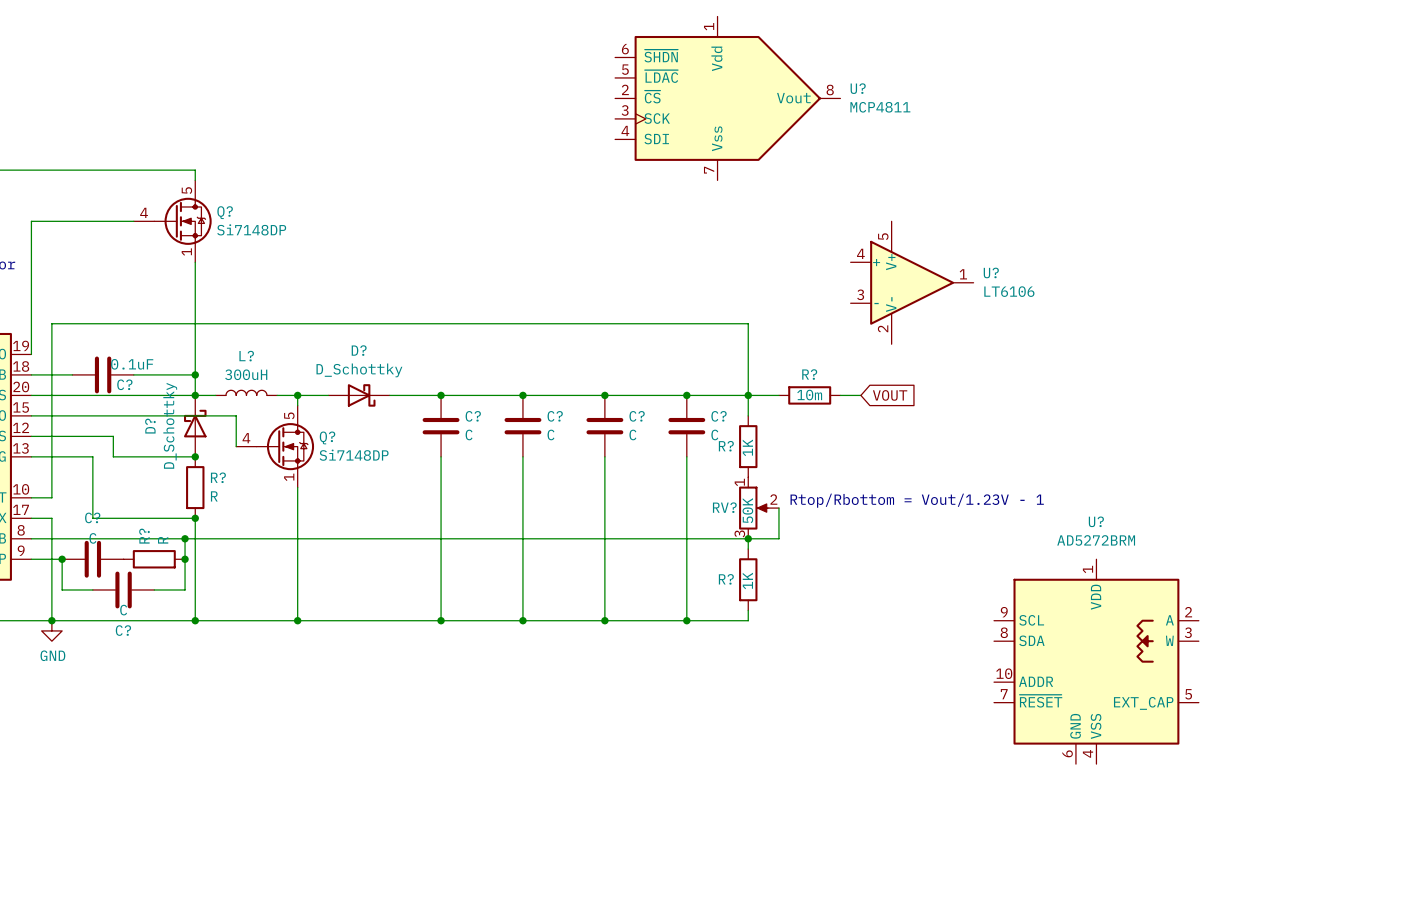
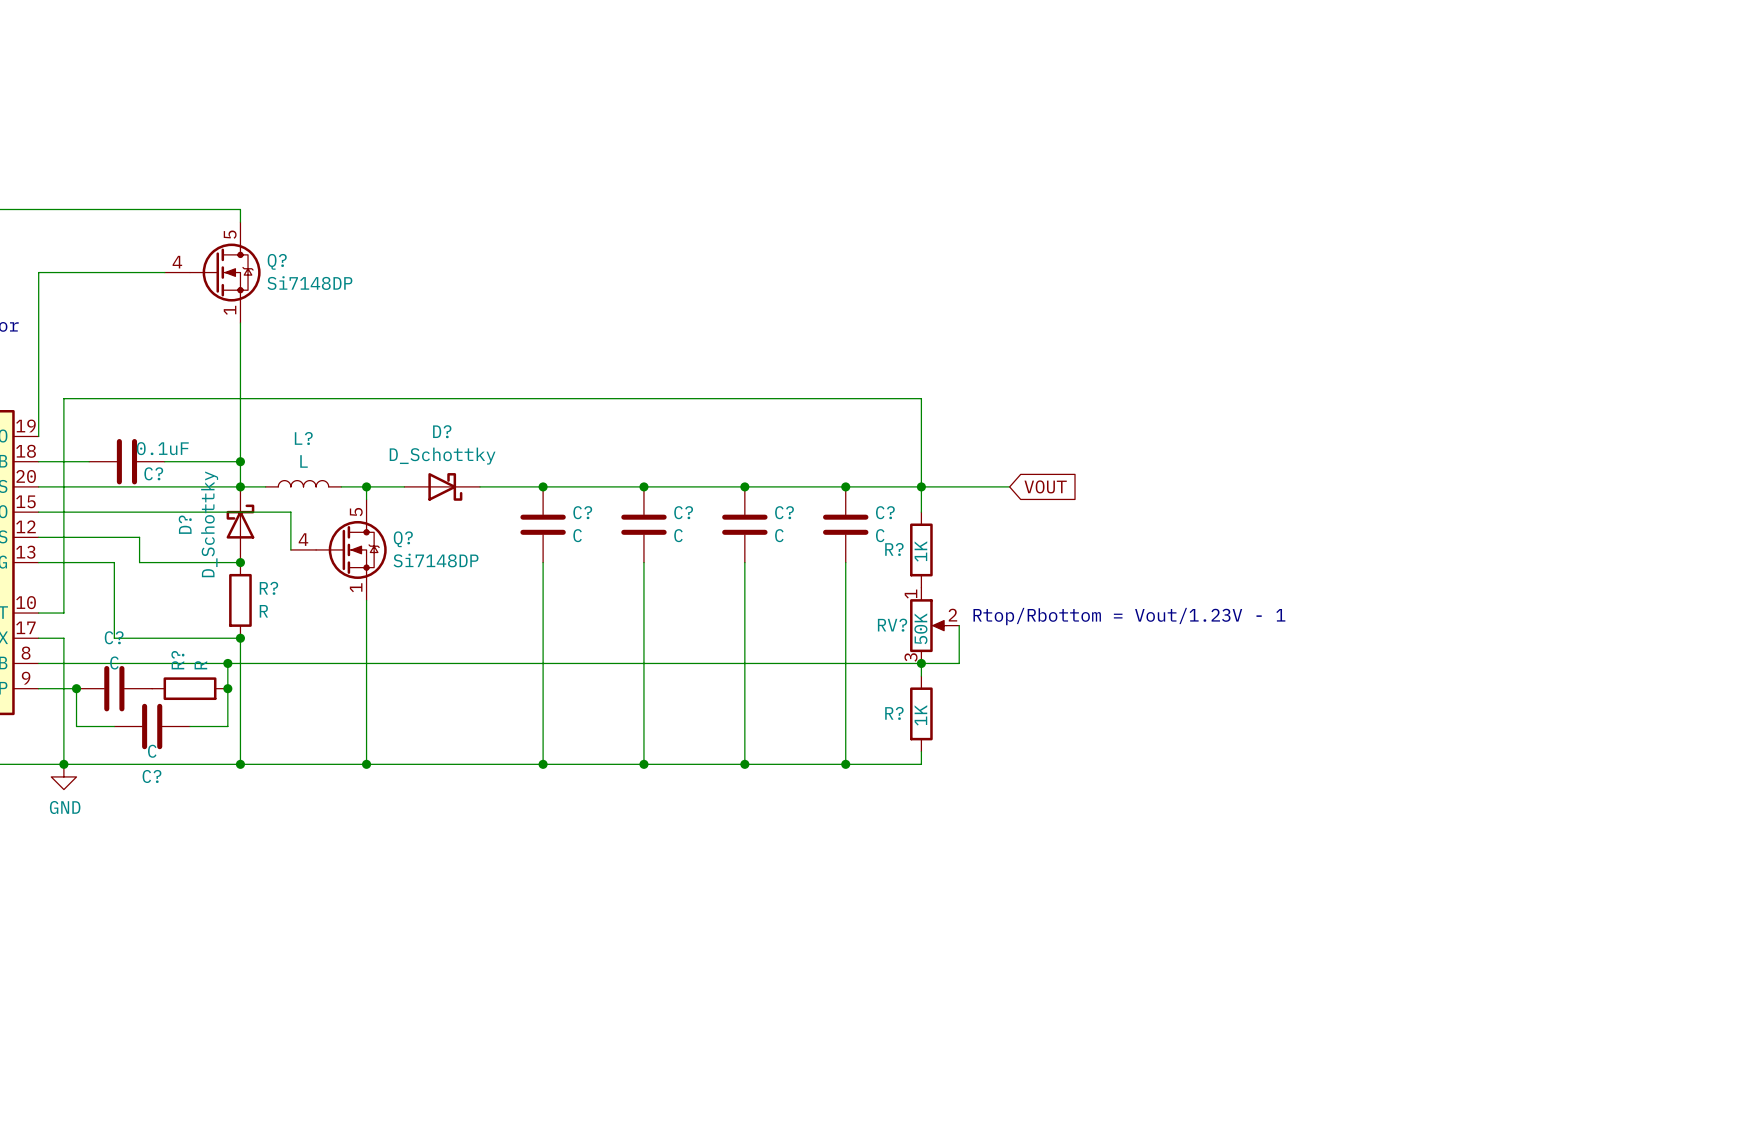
U?: MCP4811 (727, 98) -> none
U?: LT6106 (912, 282) -> none
L? value: 300uH (246, 374) -> L (303, 461)
wire: none -> (959, 486) (1009, 486)
R?: 10m (809, 395) -> none
wire: (840, 395) (860, 395) -> none
global label position: VOUT (890, 395) -> VOUT (1045, 486)
U?: AD5272BRM (1096, 661) -> none

